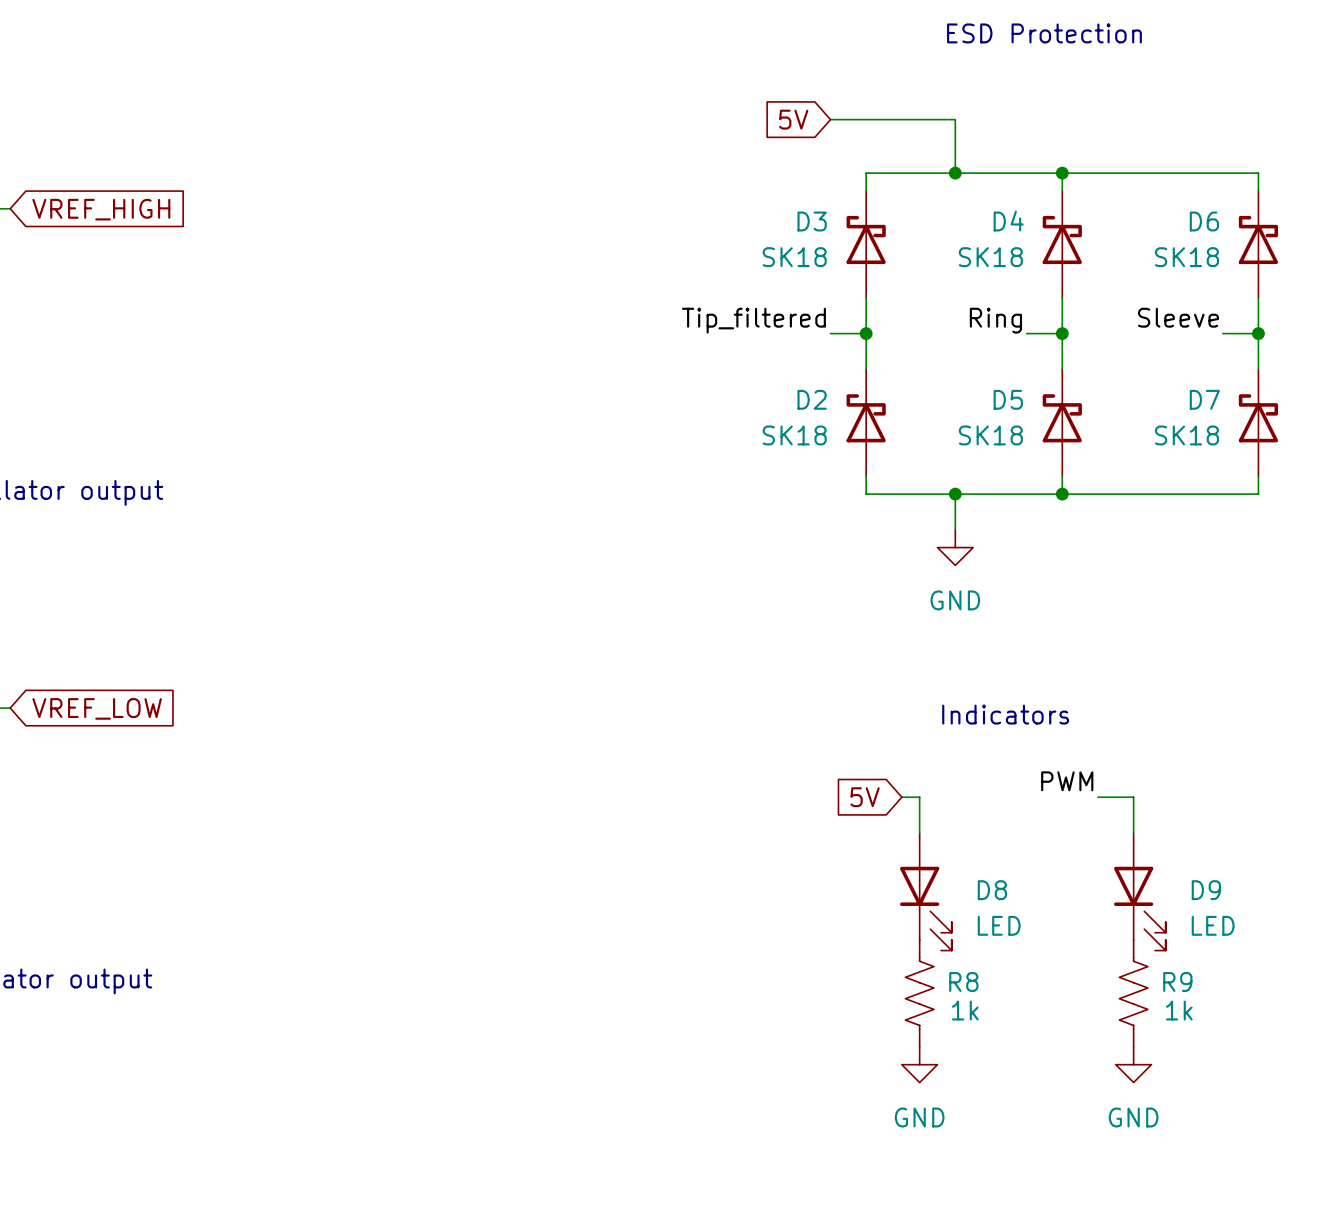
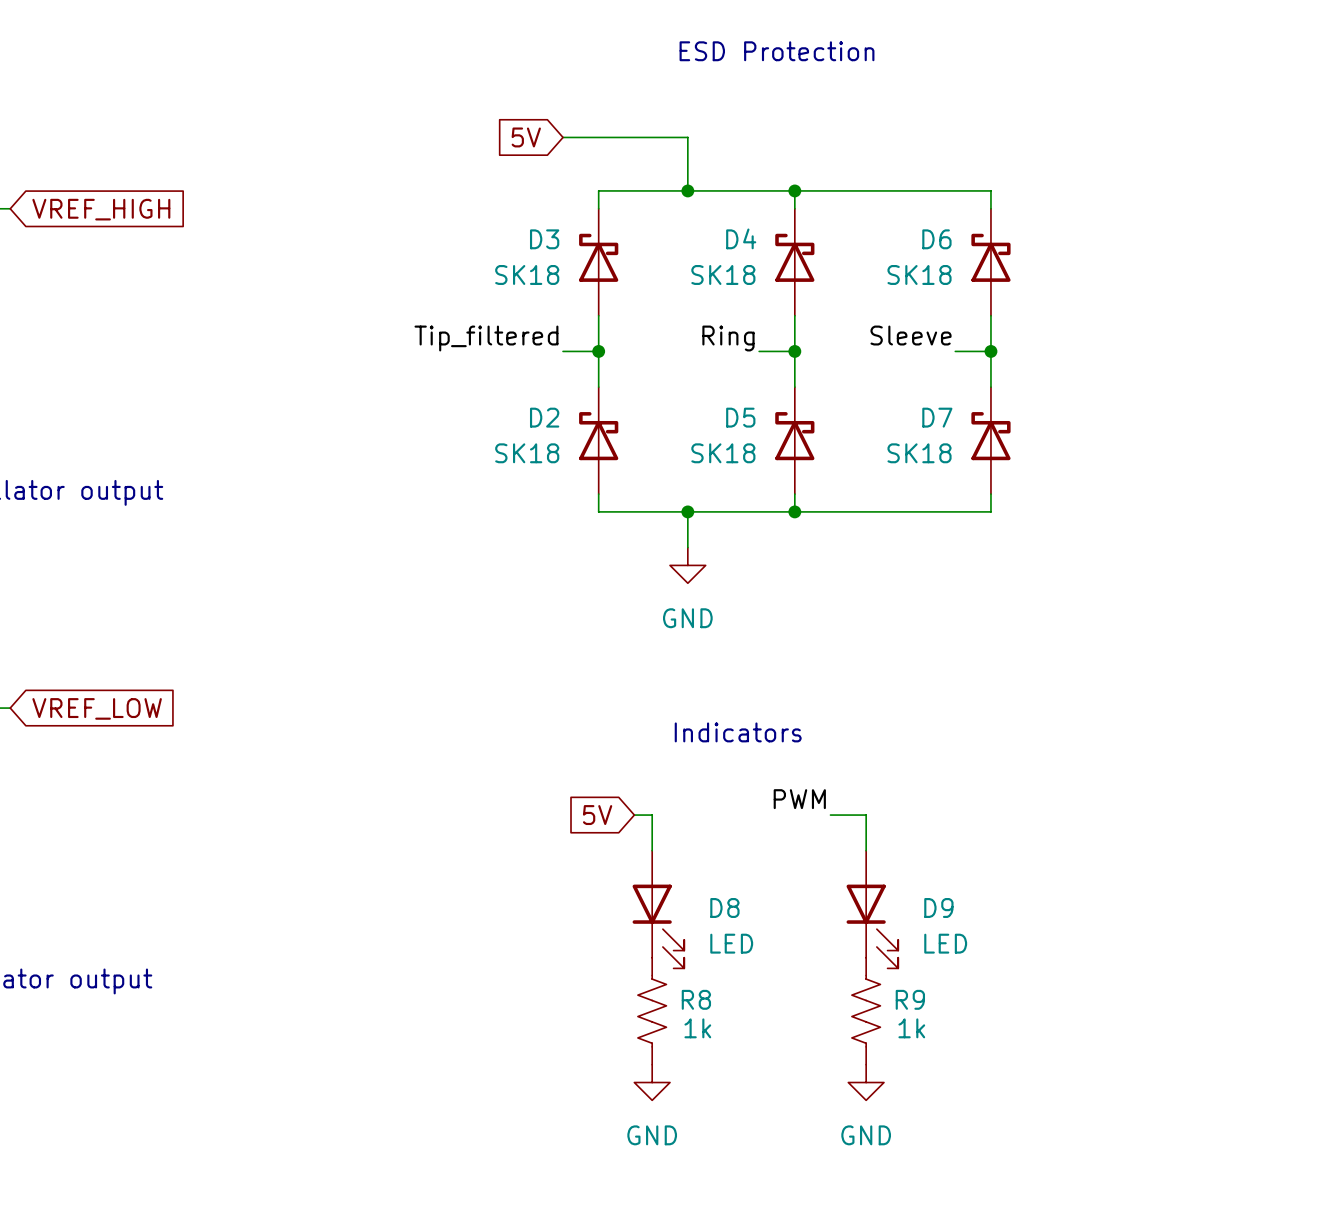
text position: ESD Protection (1044, 33) -> ESD Protection (777, 51)
global label position: 5V (793, 119) -> 5V (526, 137)
wire: (830, 119) (955, 119) (955, 173) -> (563, 137) (687, 137) (687, 190)
junction: (955, 173) -> none
wire: (1062, 173) (1062, 190) -> (794, 190) (794, 208)
junction: (1062, 173) -> none
junction: none -> (687, 190)
junction: none -> (794, 190)
wire: (866, 190) (866, 173) (1258, 173) (1258, 190) -> (598, 208) (598, 190) (990, 190) (990, 208)
D3 position: (866, 244) -> (598, 262)
D4 position: (1062, 244) -> (794, 262)
D6 position: (1258, 244) -> (990, 262)
wire: (866, 297) (866, 369) -> (598, 315) (598, 387)
wire: (1062, 297) (1062, 369) -> (794, 315) (794, 387)
wire: (1258, 297) (1258, 369) -> (990, 315) (990, 387)
label position: Sleeve (1178, 317) -> Sleeve (911, 335)
label position: Tip_filtered (753, 320) -> Tip_filtered (486, 338)
label position: Ring (995, 320) -> Ring (728, 338)
wire: (830, 333) (866, 333) -> (563, 351) (598, 351)
junction: (866, 333) -> none
wire: (1026, 333) (1062, 333) -> (759, 351) (794, 351)
junction: (1062, 333) -> none
wire: (1222, 333) (1258, 333) -> (955, 351) (990, 351)
junction: (1258, 333) -> none
junction: none -> (598, 351)
junction: none -> (794, 351)
junction: none -> (990, 351)
D2 position: (866, 422) -> (598, 440)
D5 position: (1062, 422) -> (794, 440)
D7 position: (1258, 422) -> (990, 440)
wire: (866, 476) (866, 494) (1258, 494) (1258, 476) -> (598, 494) (598, 511) (990, 511) (990, 494)
wire: (1062, 476) (1062, 494) -> (794, 494) (794, 511)
wire: (955, 494) (955, 529) -> (687, 511) (687, 547)
junction: (955, 494) -> none
junction: (1062, 494) -> none
junction: none -> (687, 511)
junction: none -> (794, 511)
power symbol position: GND (955, 547) -> GND (687, 565)
text position: Indicators (1005, 714) -> Indicators (738, 732)
label position: PWM (1067, 781) -> PWM (799, 799)
global label position: 5V (865, 797) -> 5V (597, 815)
wire: (901, 797) (919, 797) (919, 832) -> (634, 815) (652, 815) (652, 850)
wire: (1097, 797) (1133, 797) (1133, 832) -> (830, 815) (866, 815) (866, 850)
D8 position: (925, 891) -> (658, 909)
D9 position: (1139, 891) -> (872, 909)
R8 position: (919, 993) -> (652, 1011)
R9 position: (1133, 993) -> (866, 1011)
power symbol position: GND (919, 1064) -> GND (866, 1082)
power symbol: GND (1133, 1064) -> none
power symbol: none -> GND (652, 1082)

